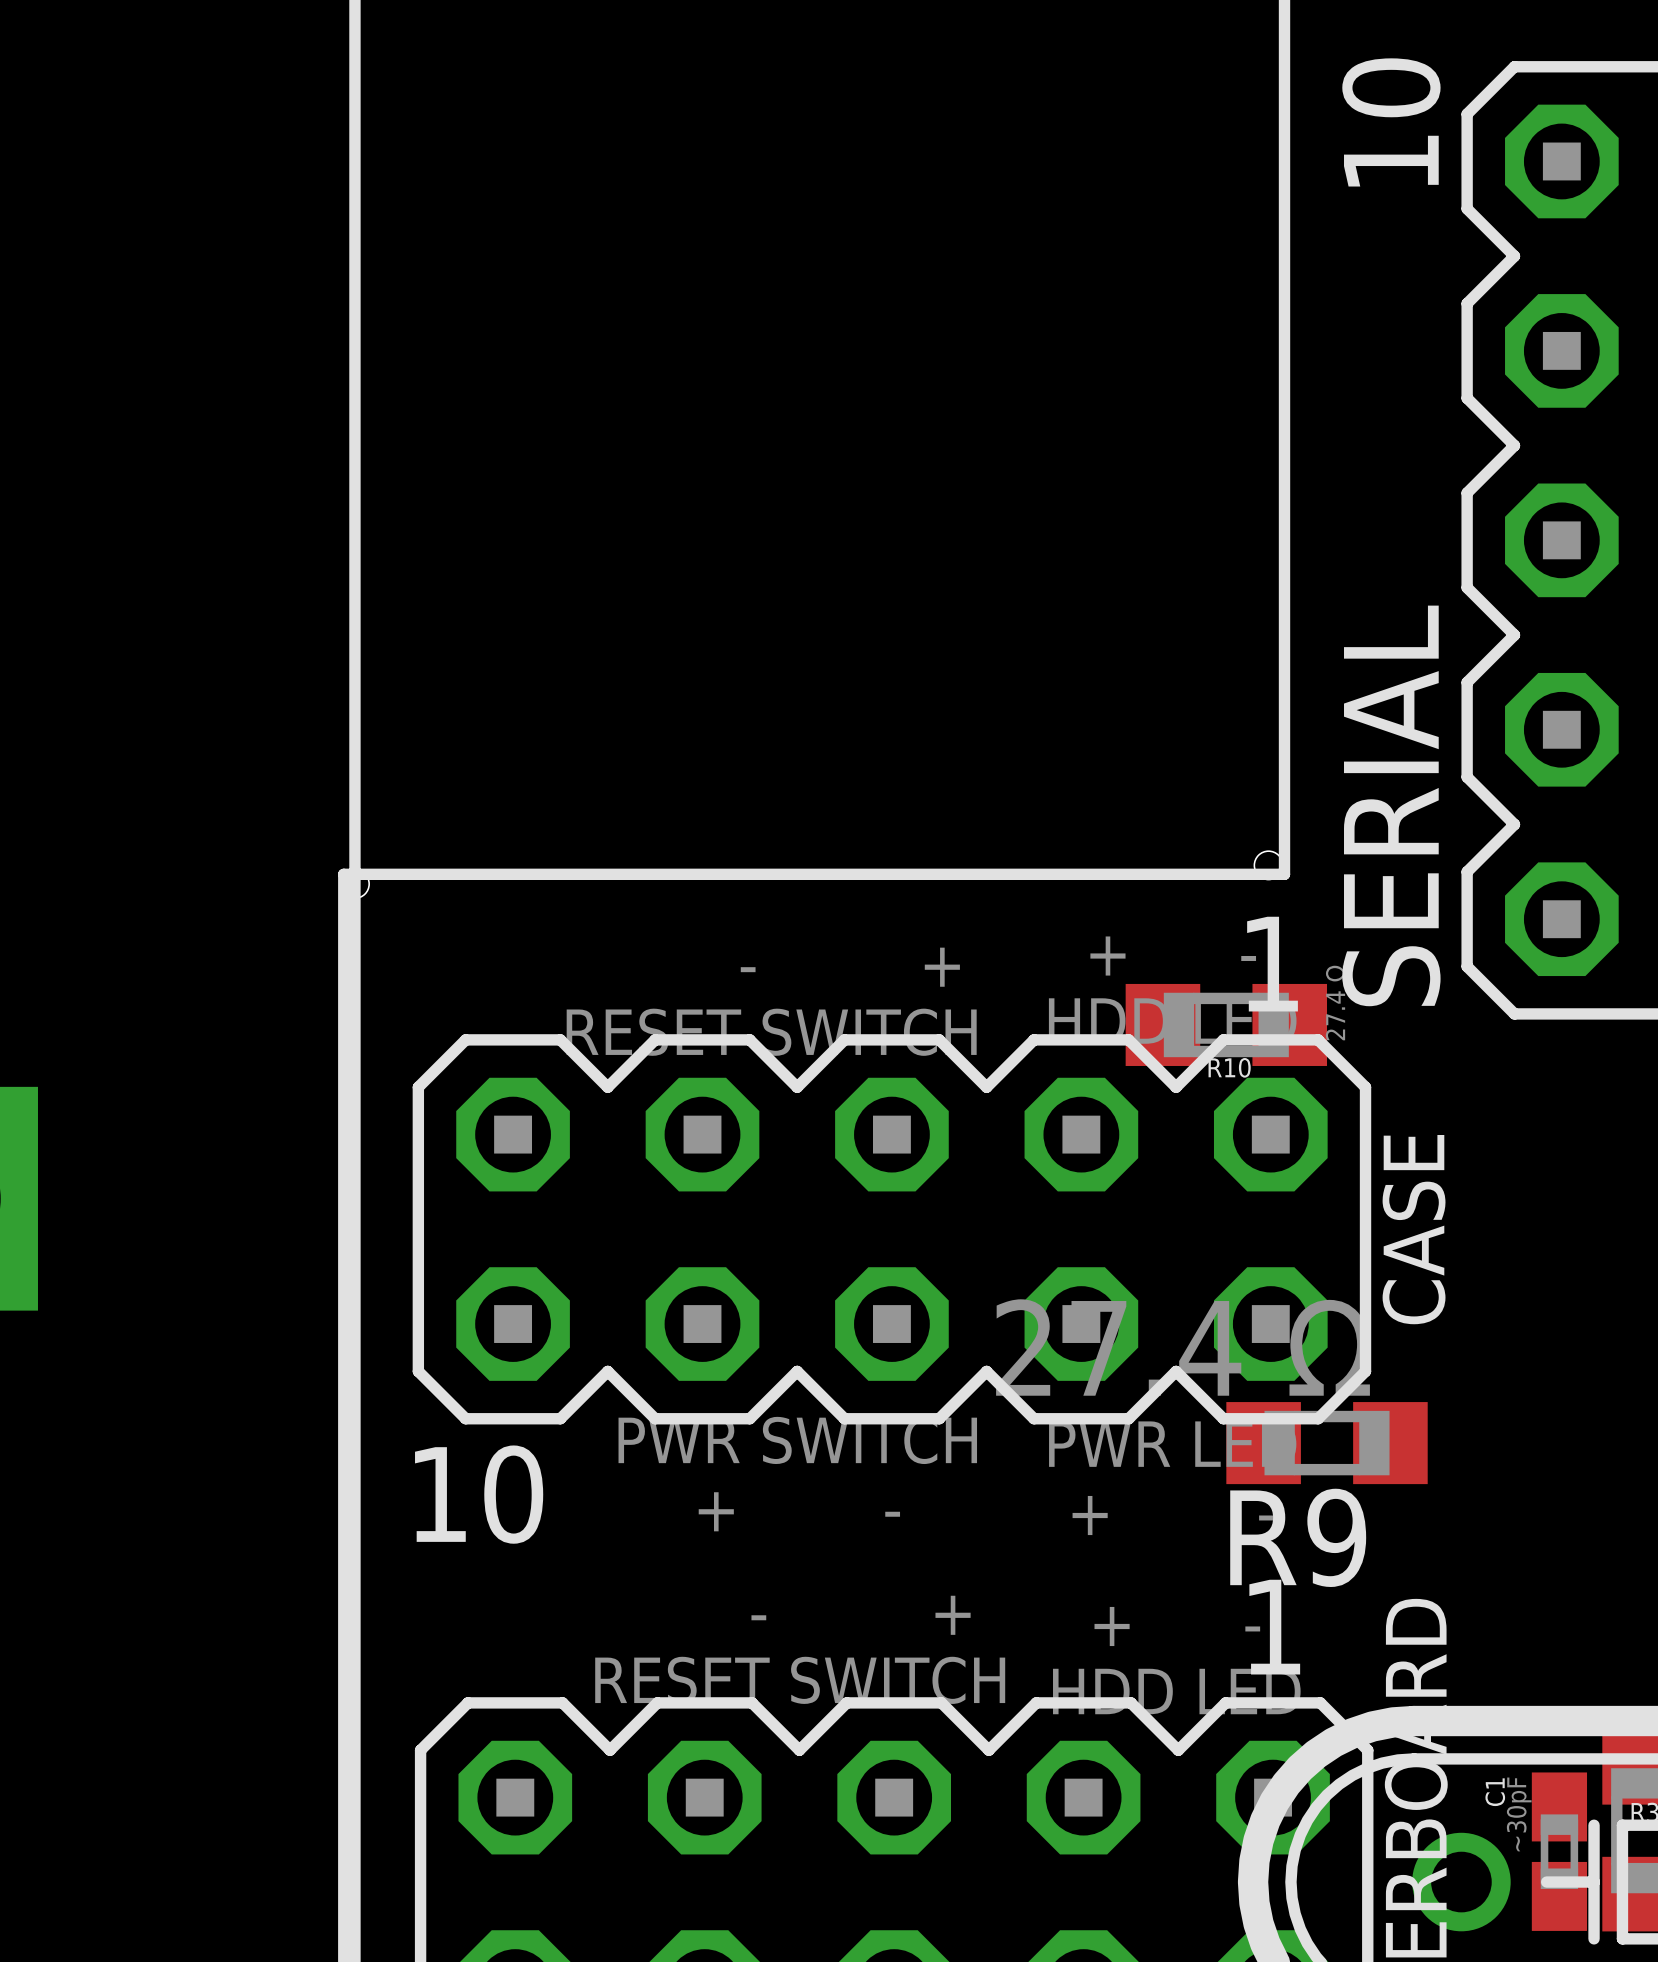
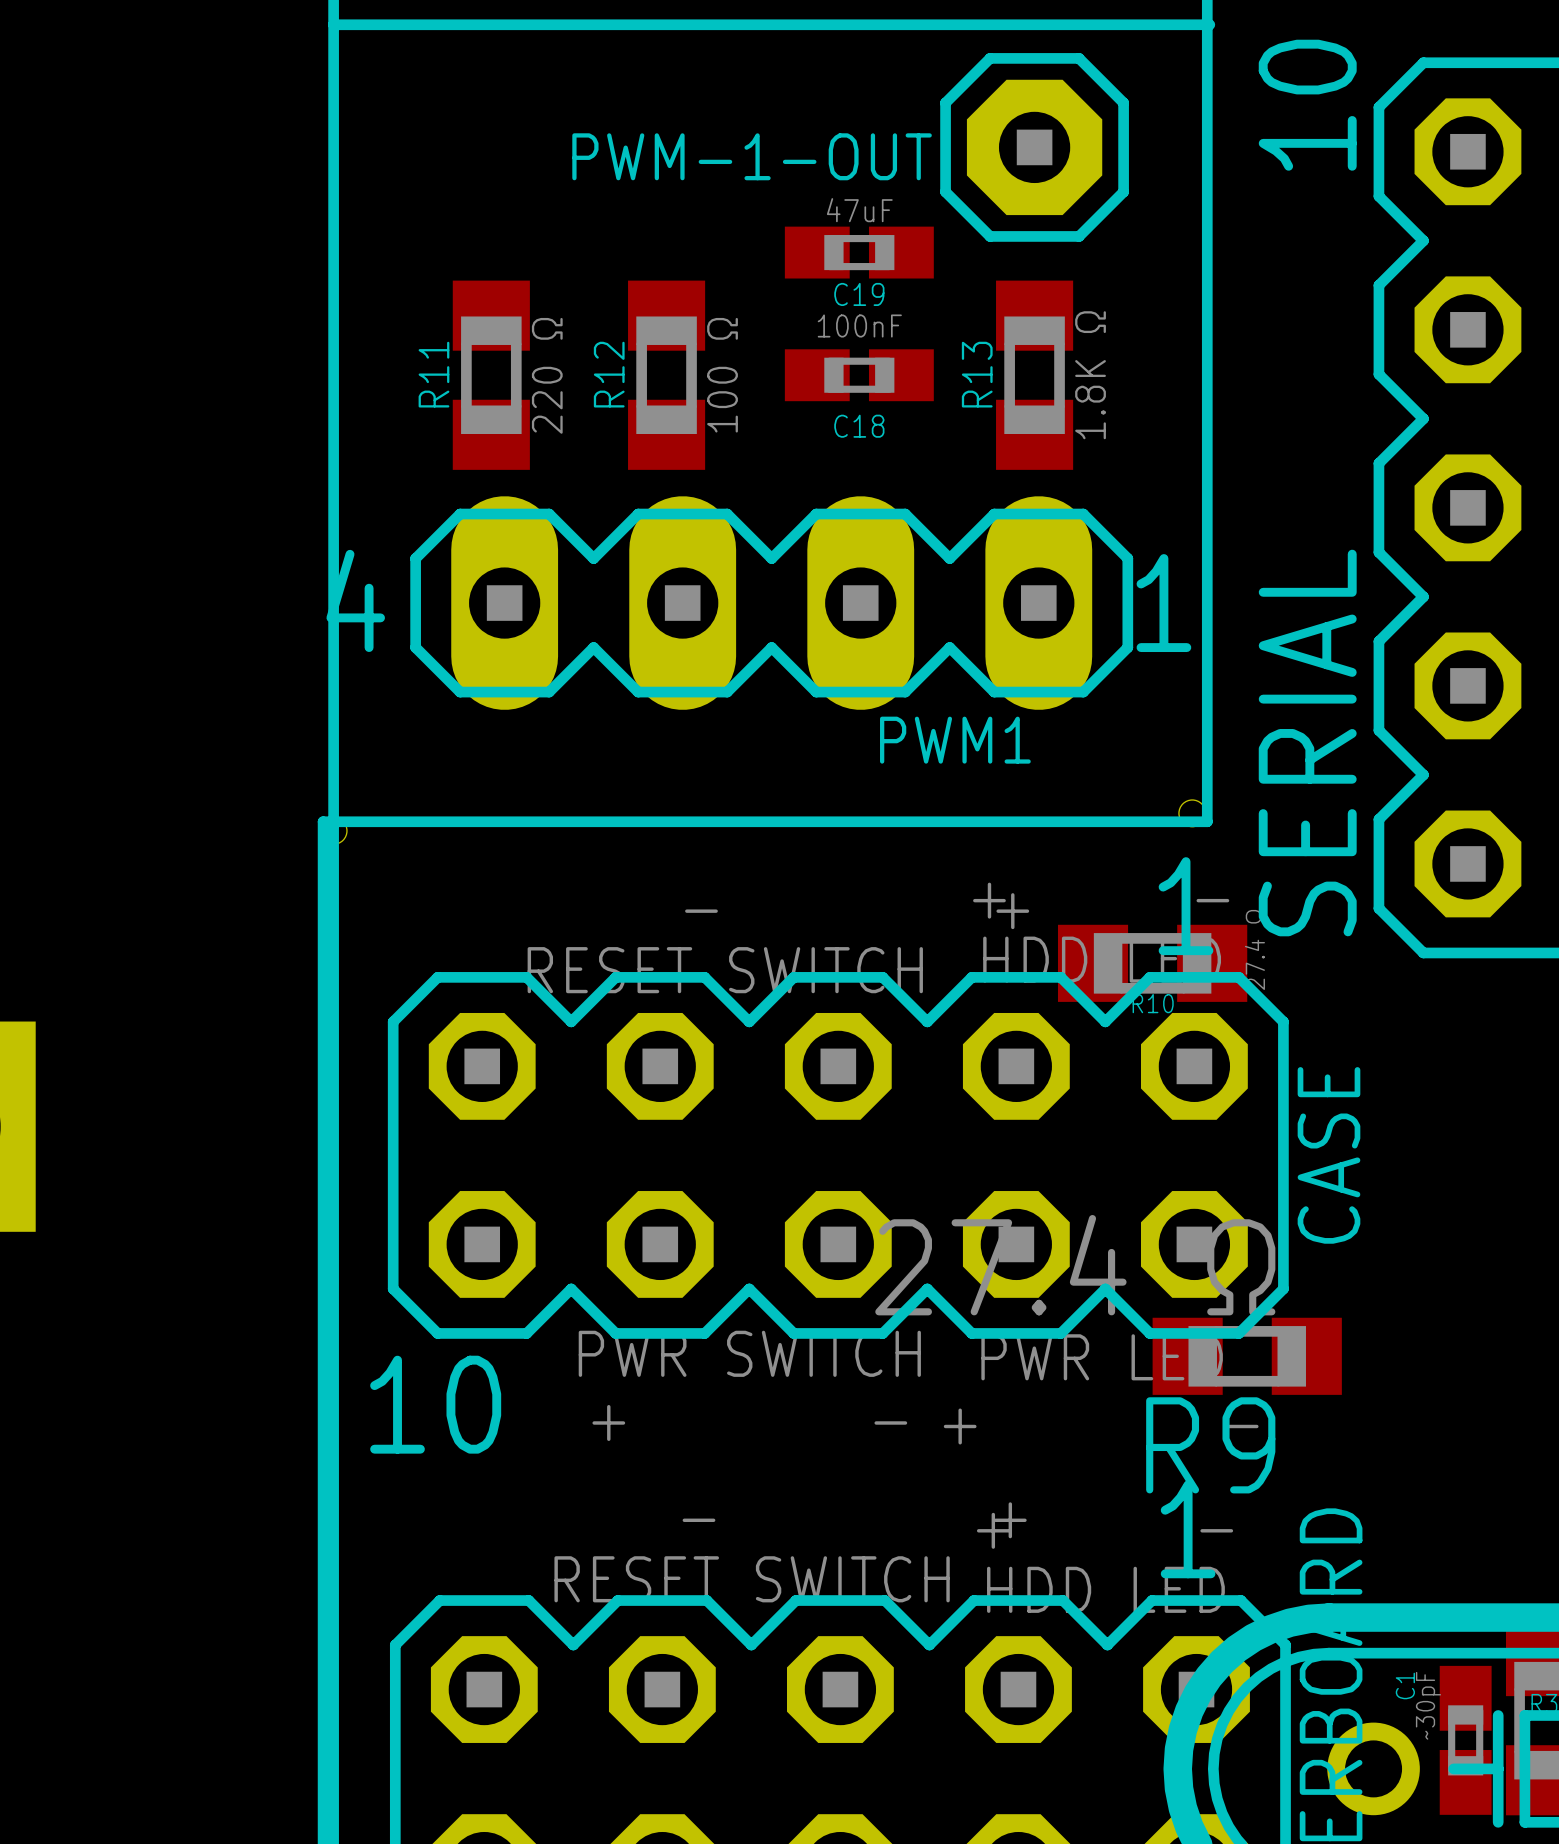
line: none -> (333, 24) (1209, 24)
PWM-1-OUT: none -> (1034, 147)
C19: none -> 47uF (859, 252)
R11: none -> 220 Ω (491, 375)
R12: none -> 100 Ω (666, 375)
C18: none -> 100nF (859, 375)
R13: none -> 1.8K Ω (1034, 375)
PWM1: none -> (771, 603)

